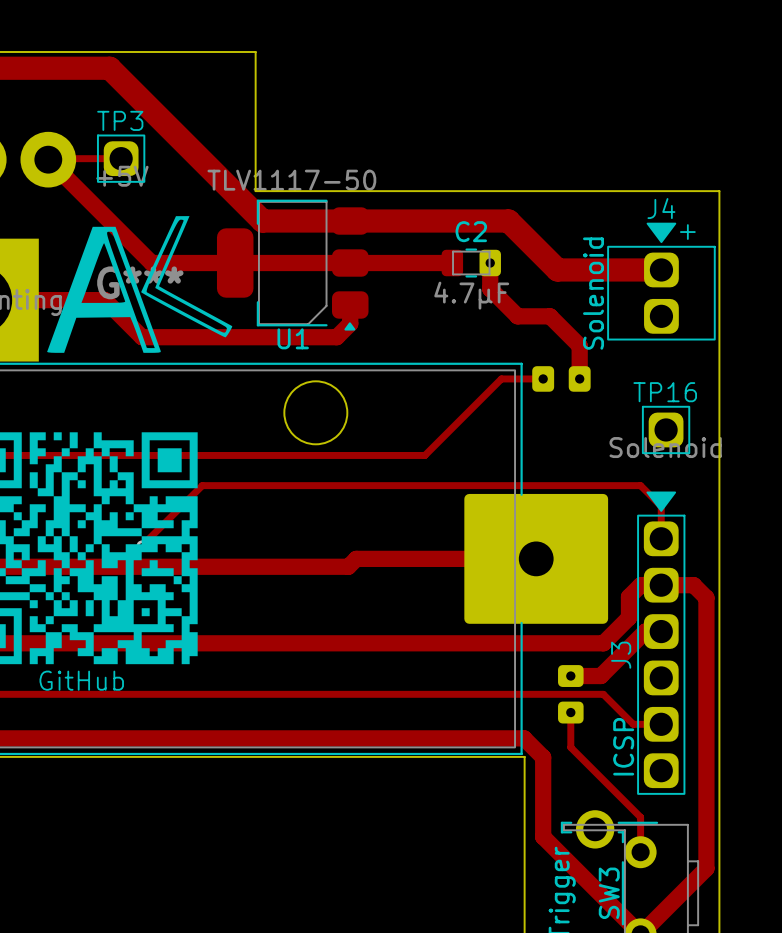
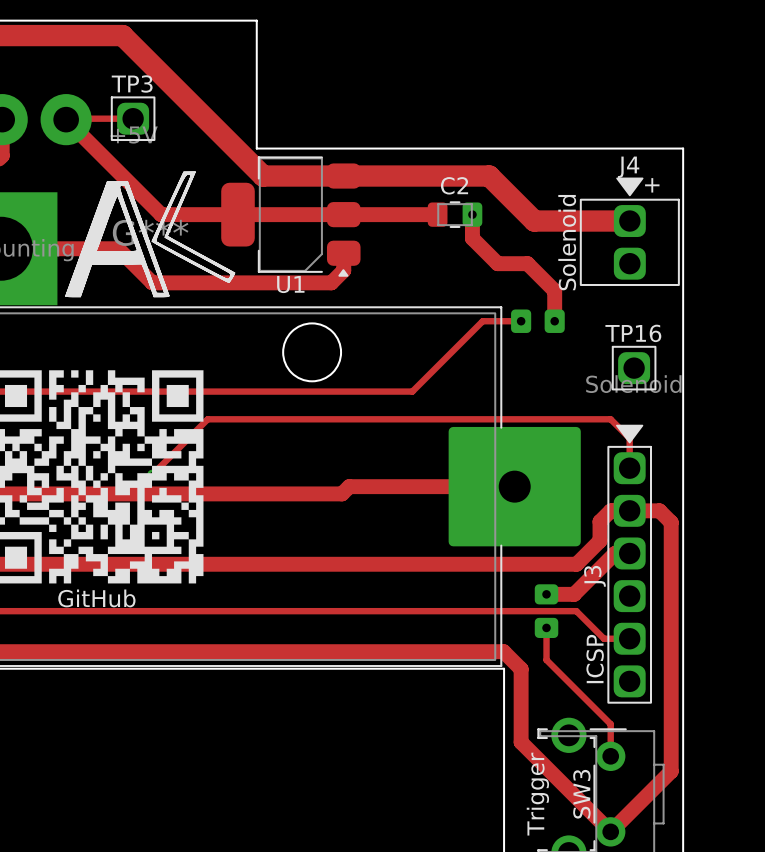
U1 value: TLV1117-50 (291, 180) -> none
drawing: none -> [65, 171, 236, 298]
C2 value: 4.7µF (471, 295) -> none

